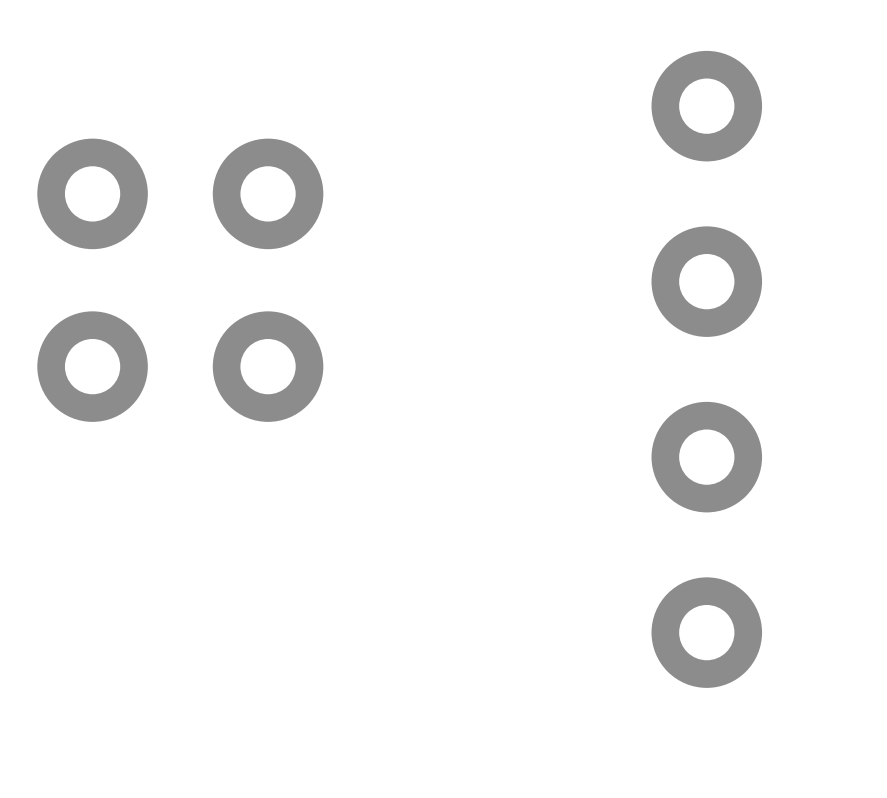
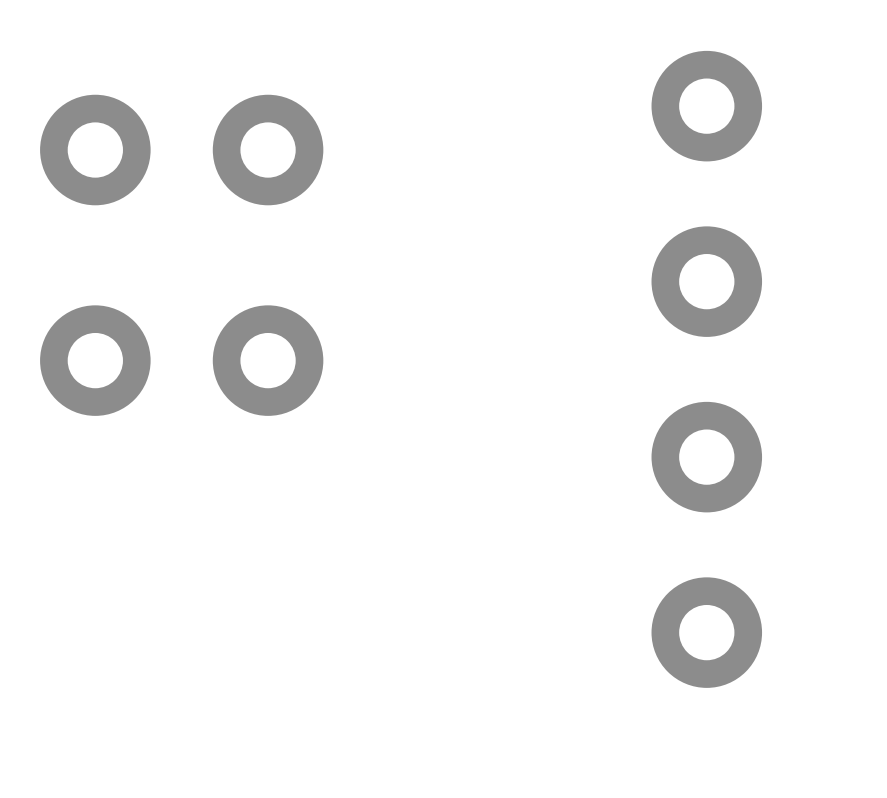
part: none -> (181, 150)
part: (92, 280) -> none
part: (268, 280) -> none
part: none -> (181, 360)

